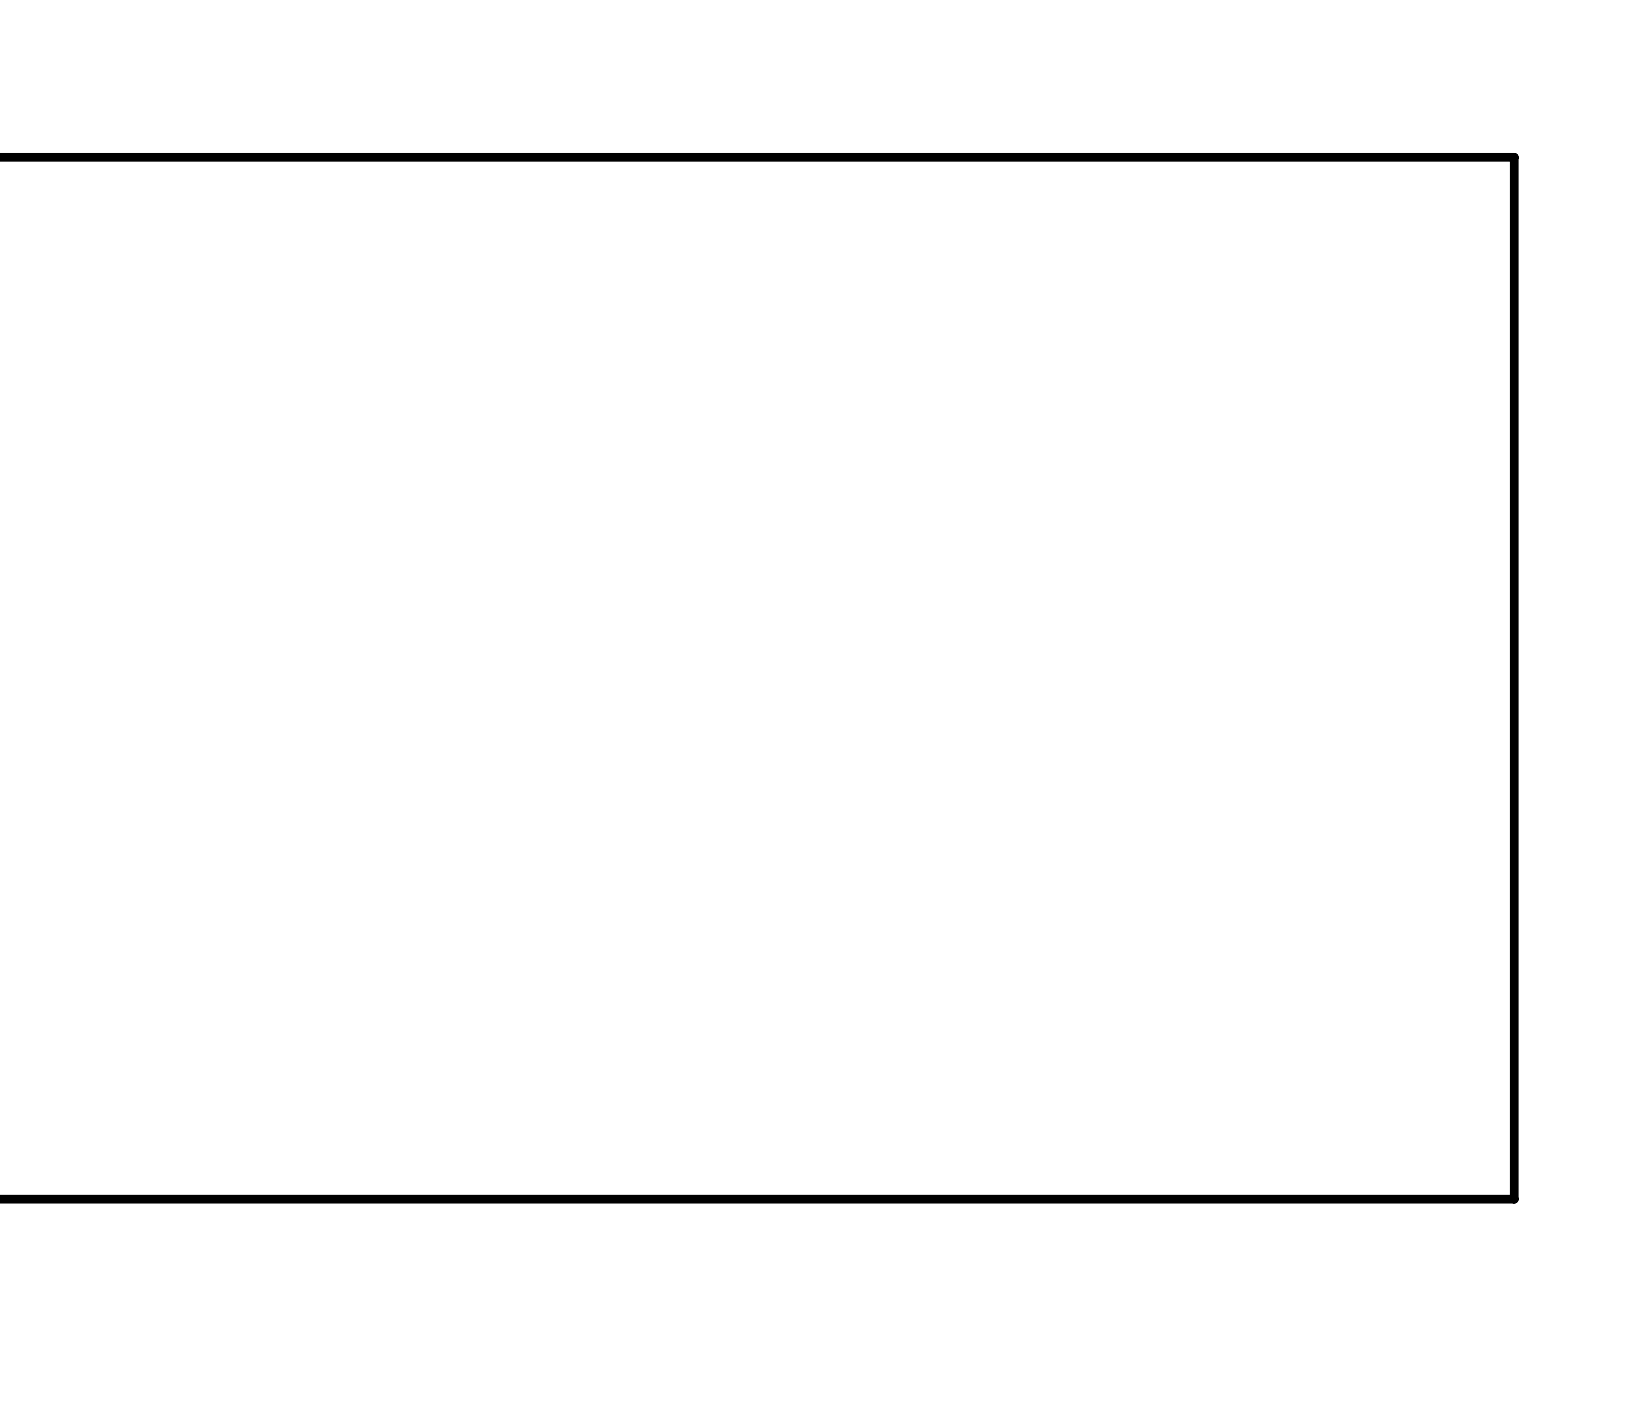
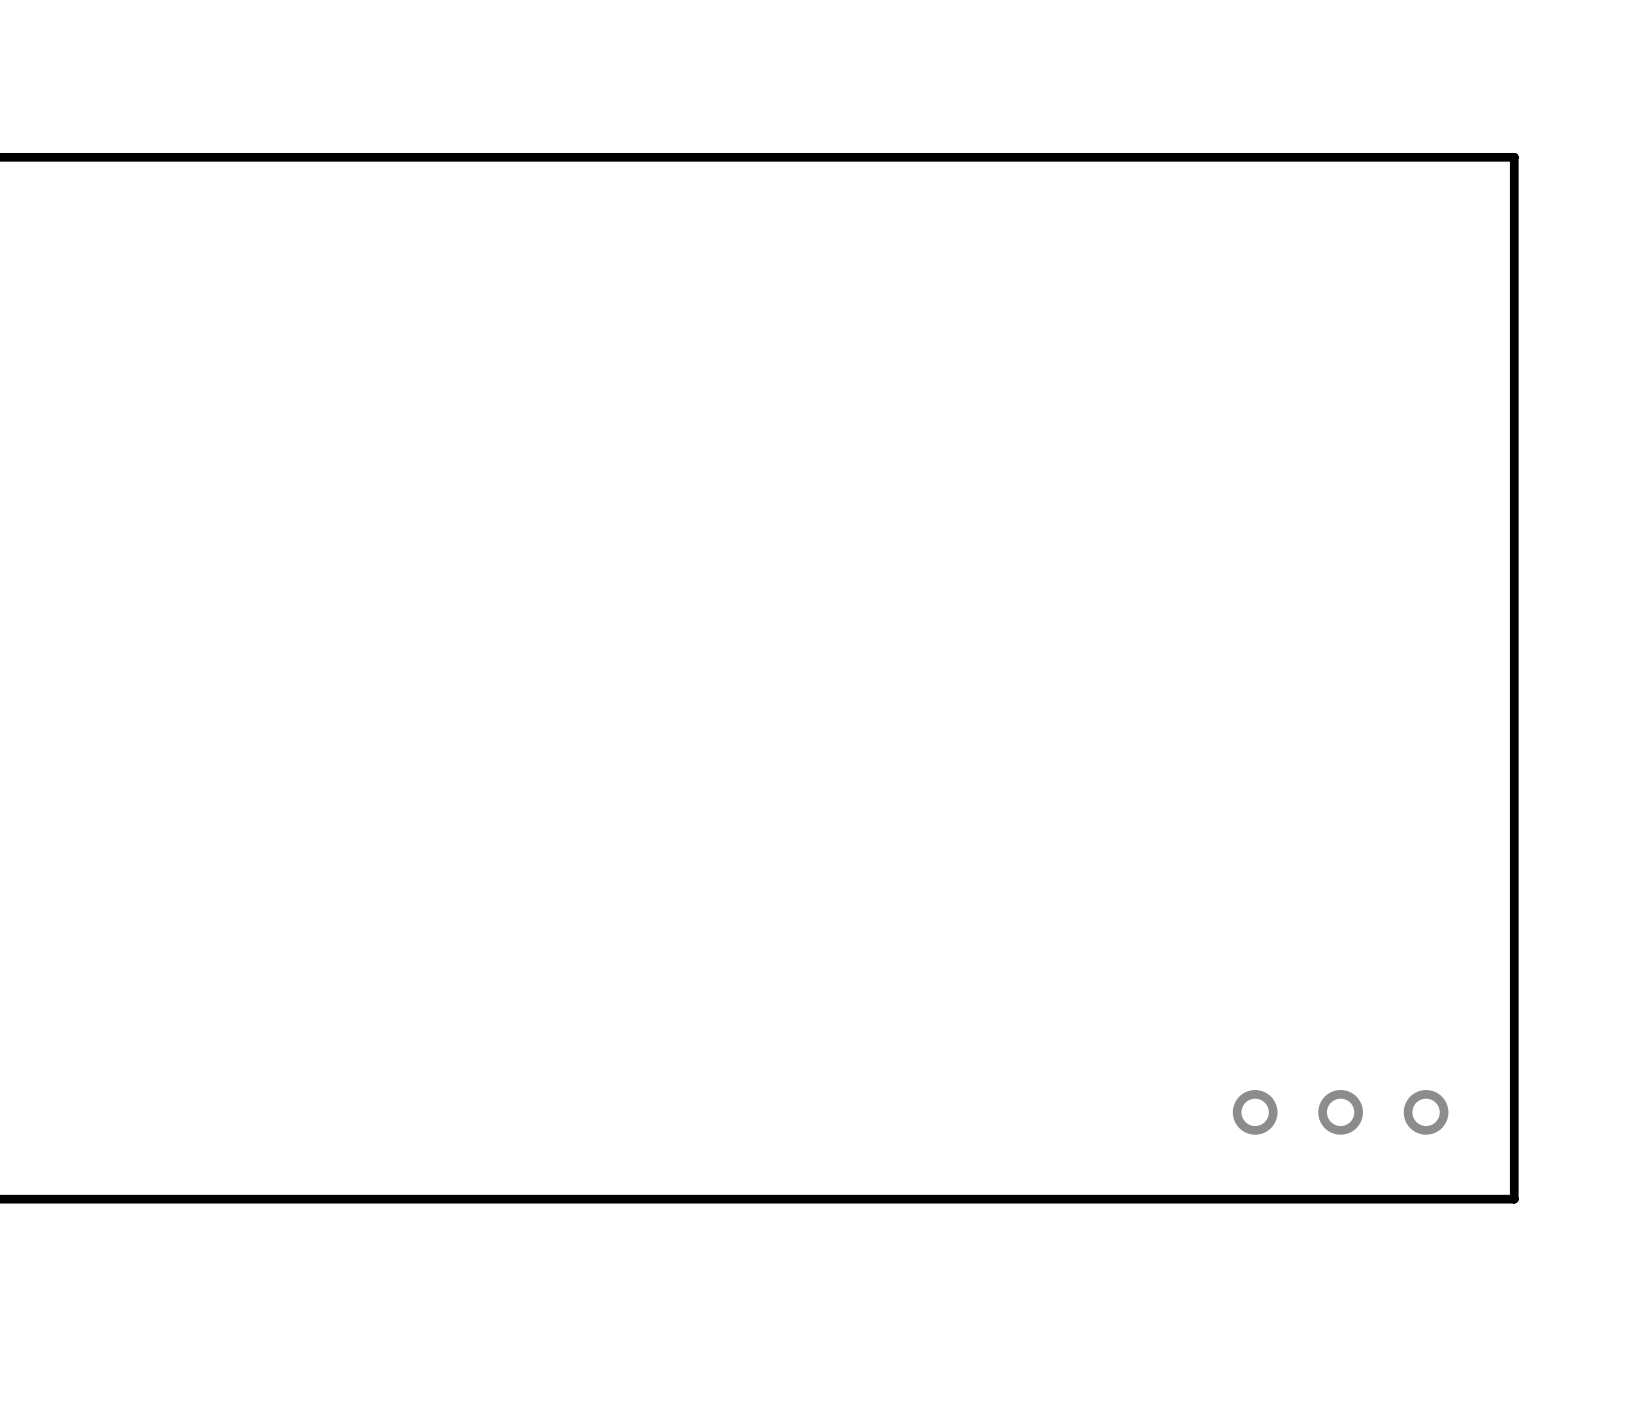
part: none -> (1340, 1112)

